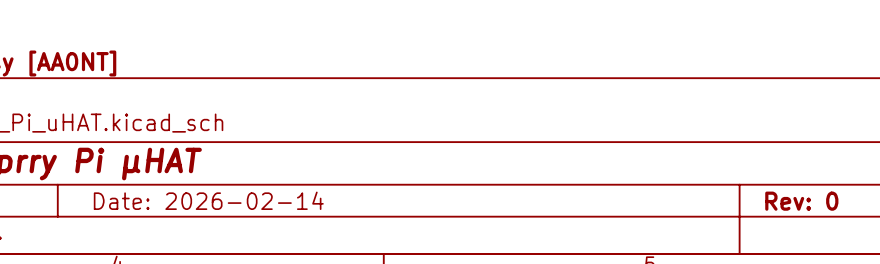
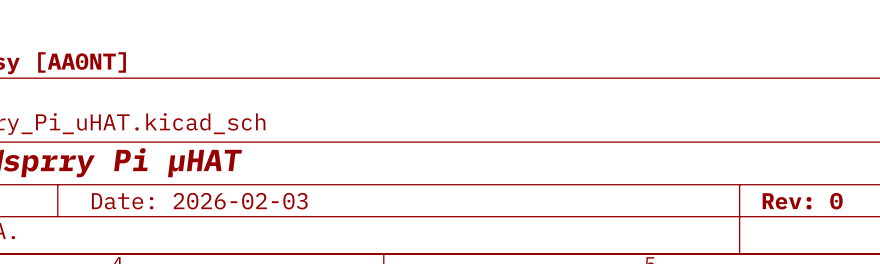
title block: Date: 2026-02-14 (208, 200) -> Date: 2026-02-03 (199, 201)

